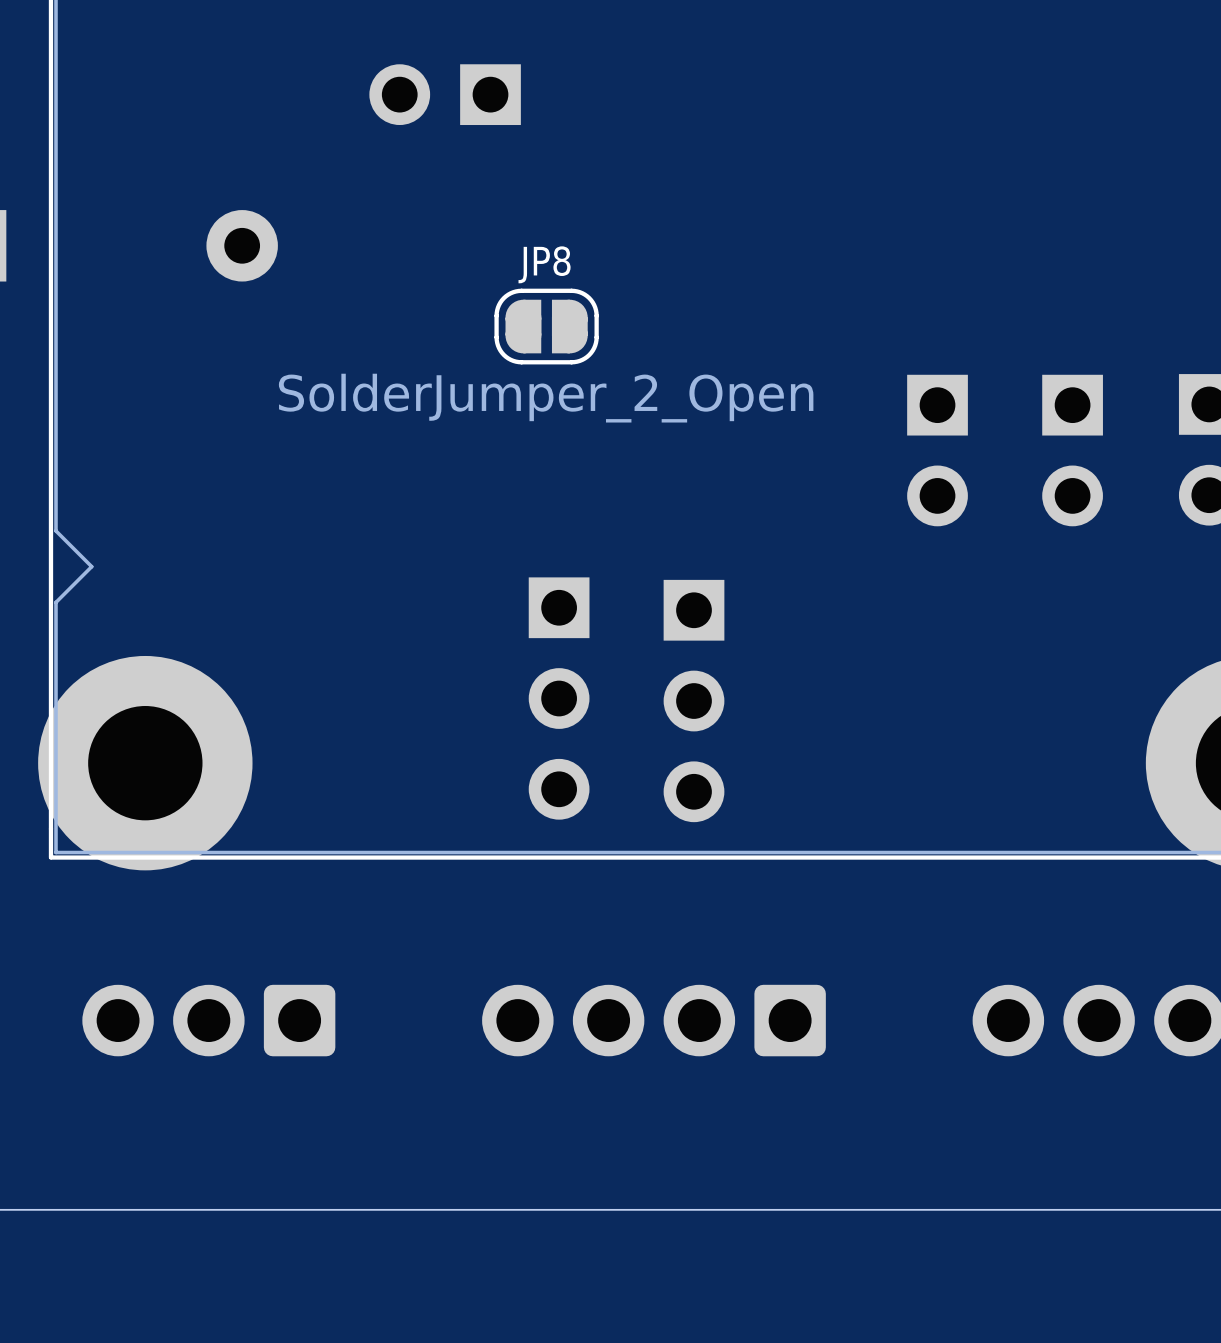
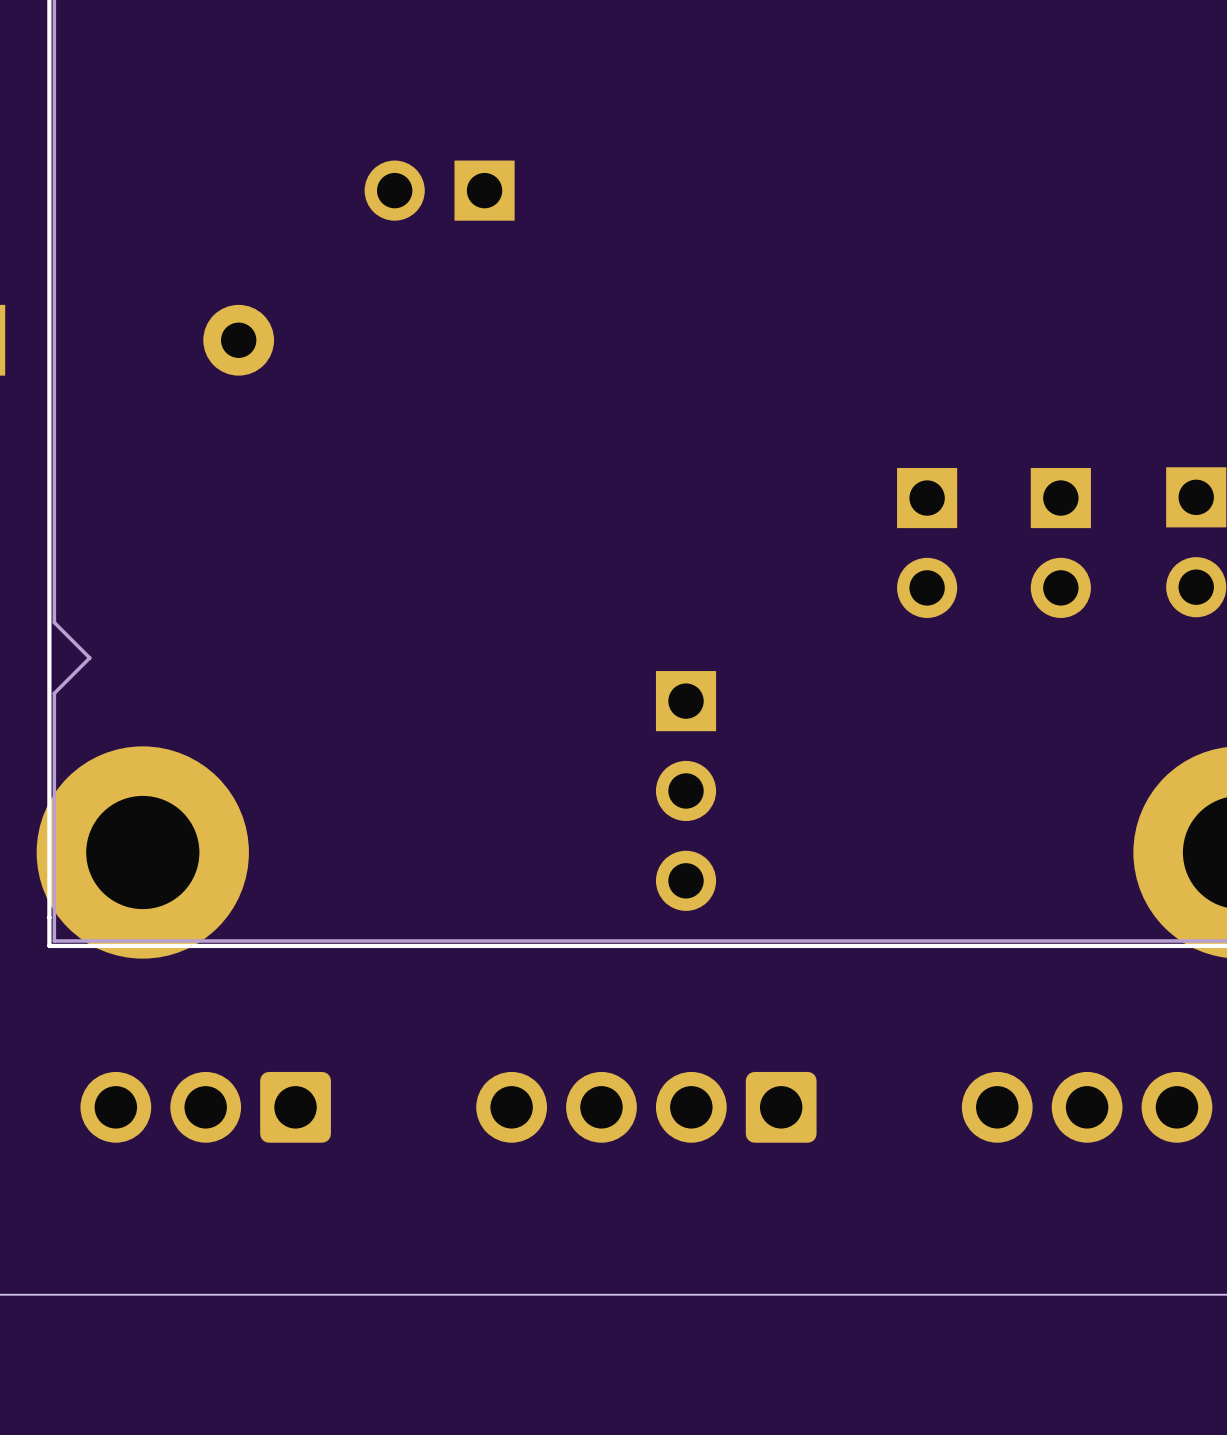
JP8: SolderJumper_2_Open (546, 326) -> none
part: (559, 698) -> none

